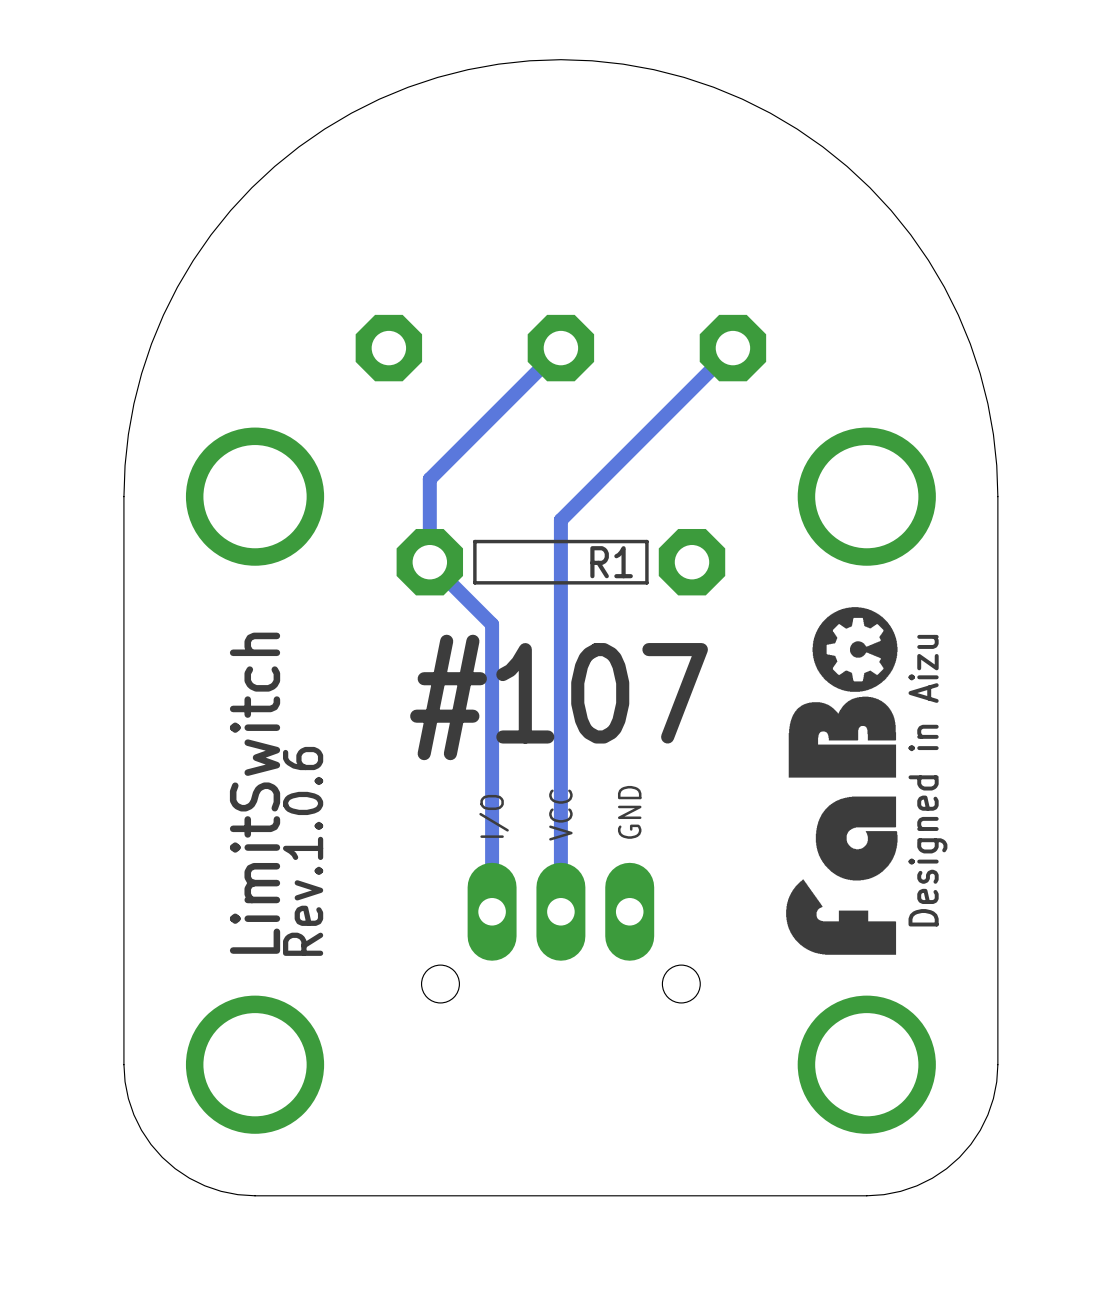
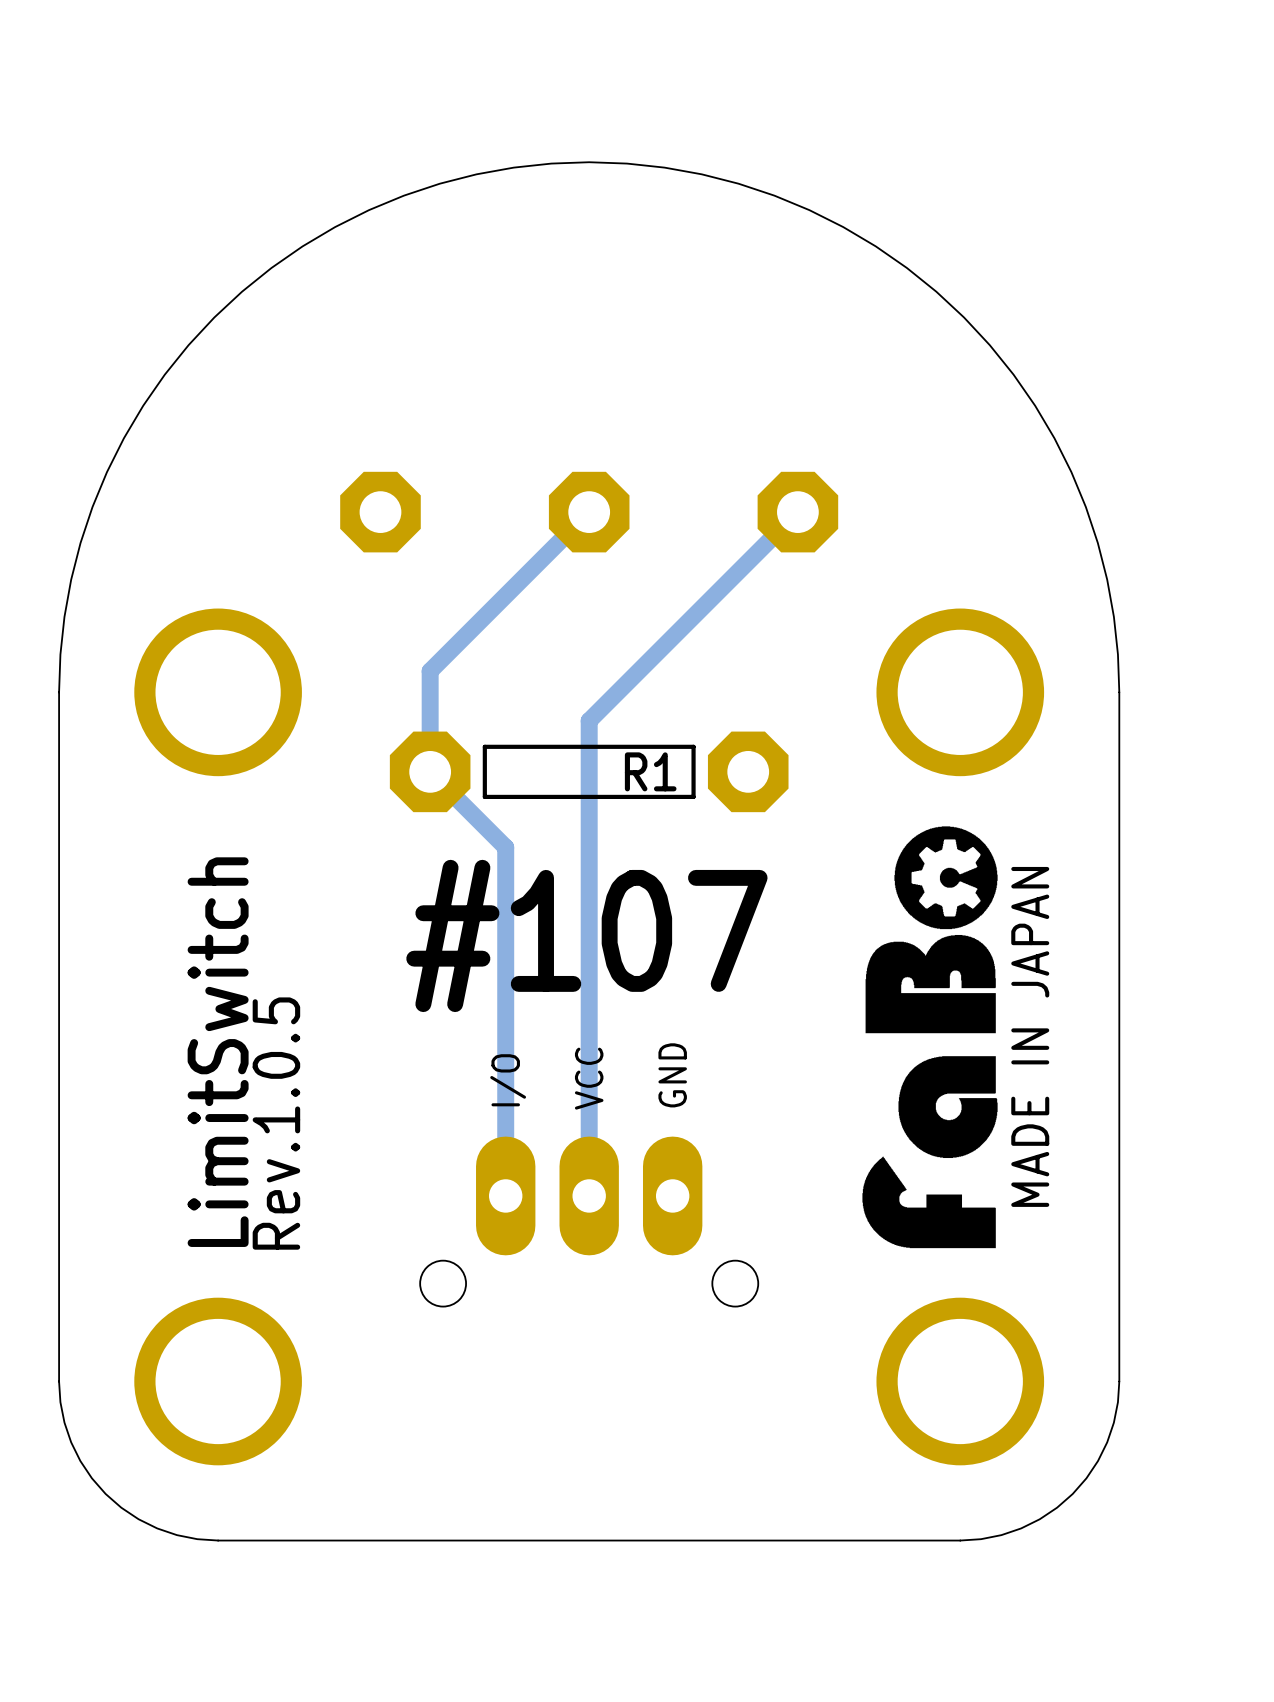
text: Designed in Aizu (927, 780) -> MADE IN JAPAN (1030, 1036)
text: Rev.1.0.6 (303, 851) -> Rev.1.0.5 (276, 1123)

